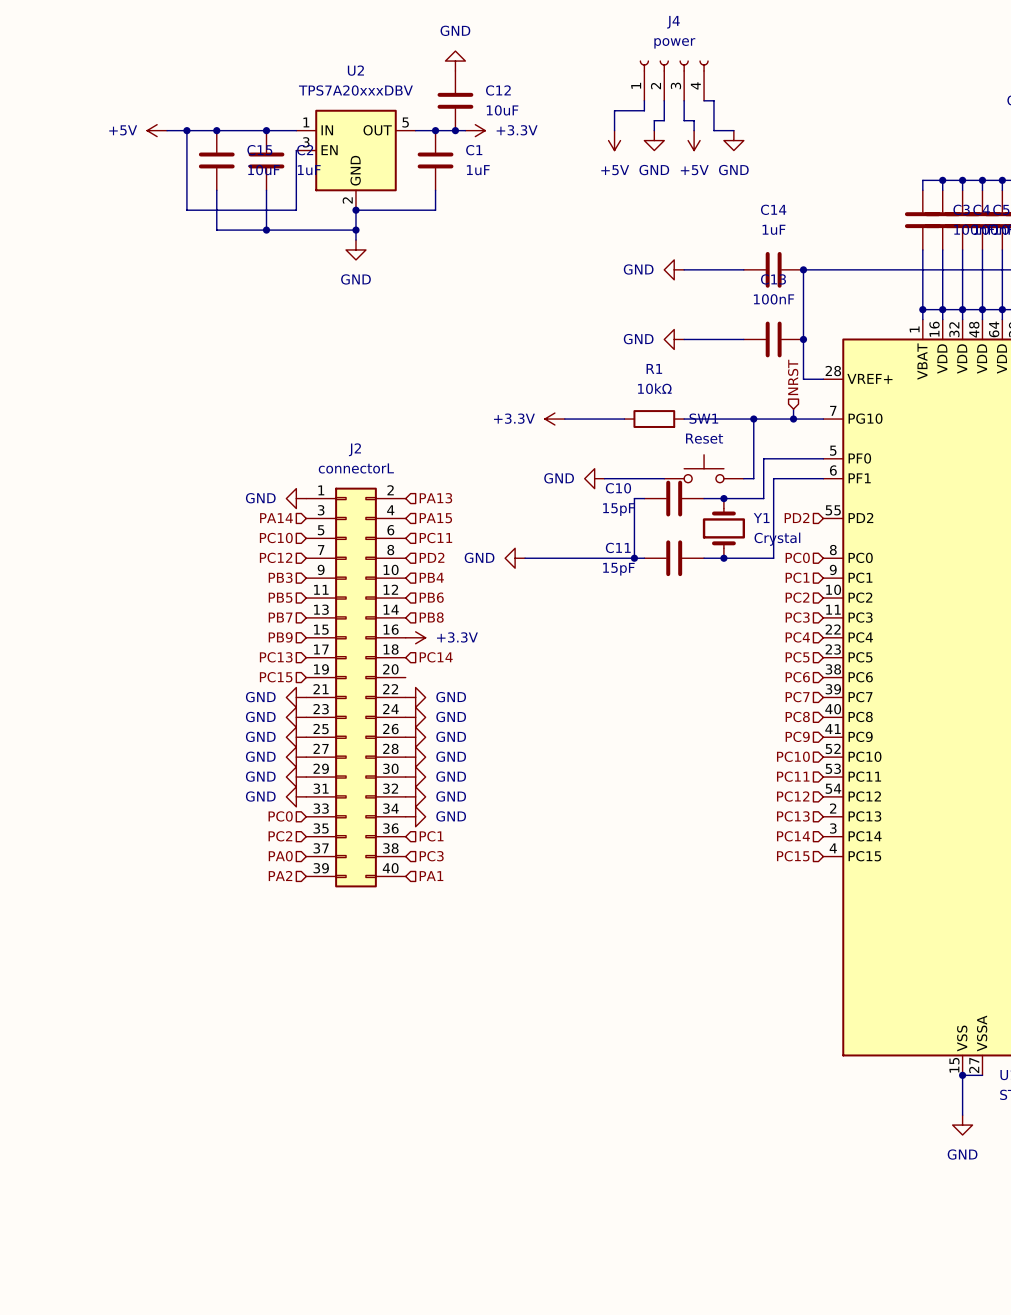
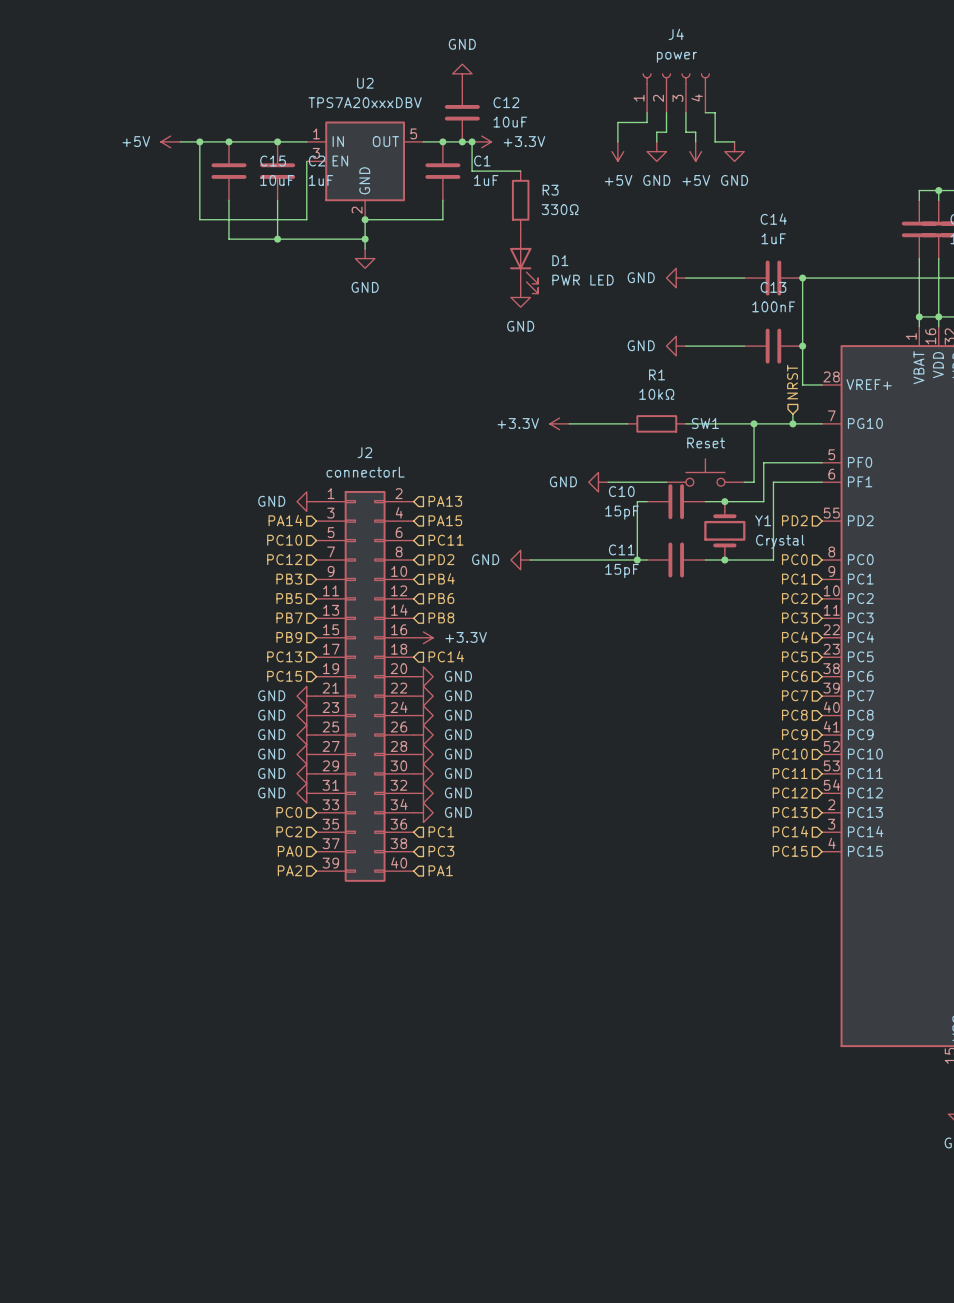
wire: none -> (472, 141) (472, 171) (520, 171)
junction: none -> (472, 141)
R3: none -> 330Ω (520, 200)
D1: none -> PWR LED (524, 261)
power symbol: none -> GND (520, 297)
power symbol: none -> GND (423, 676)

